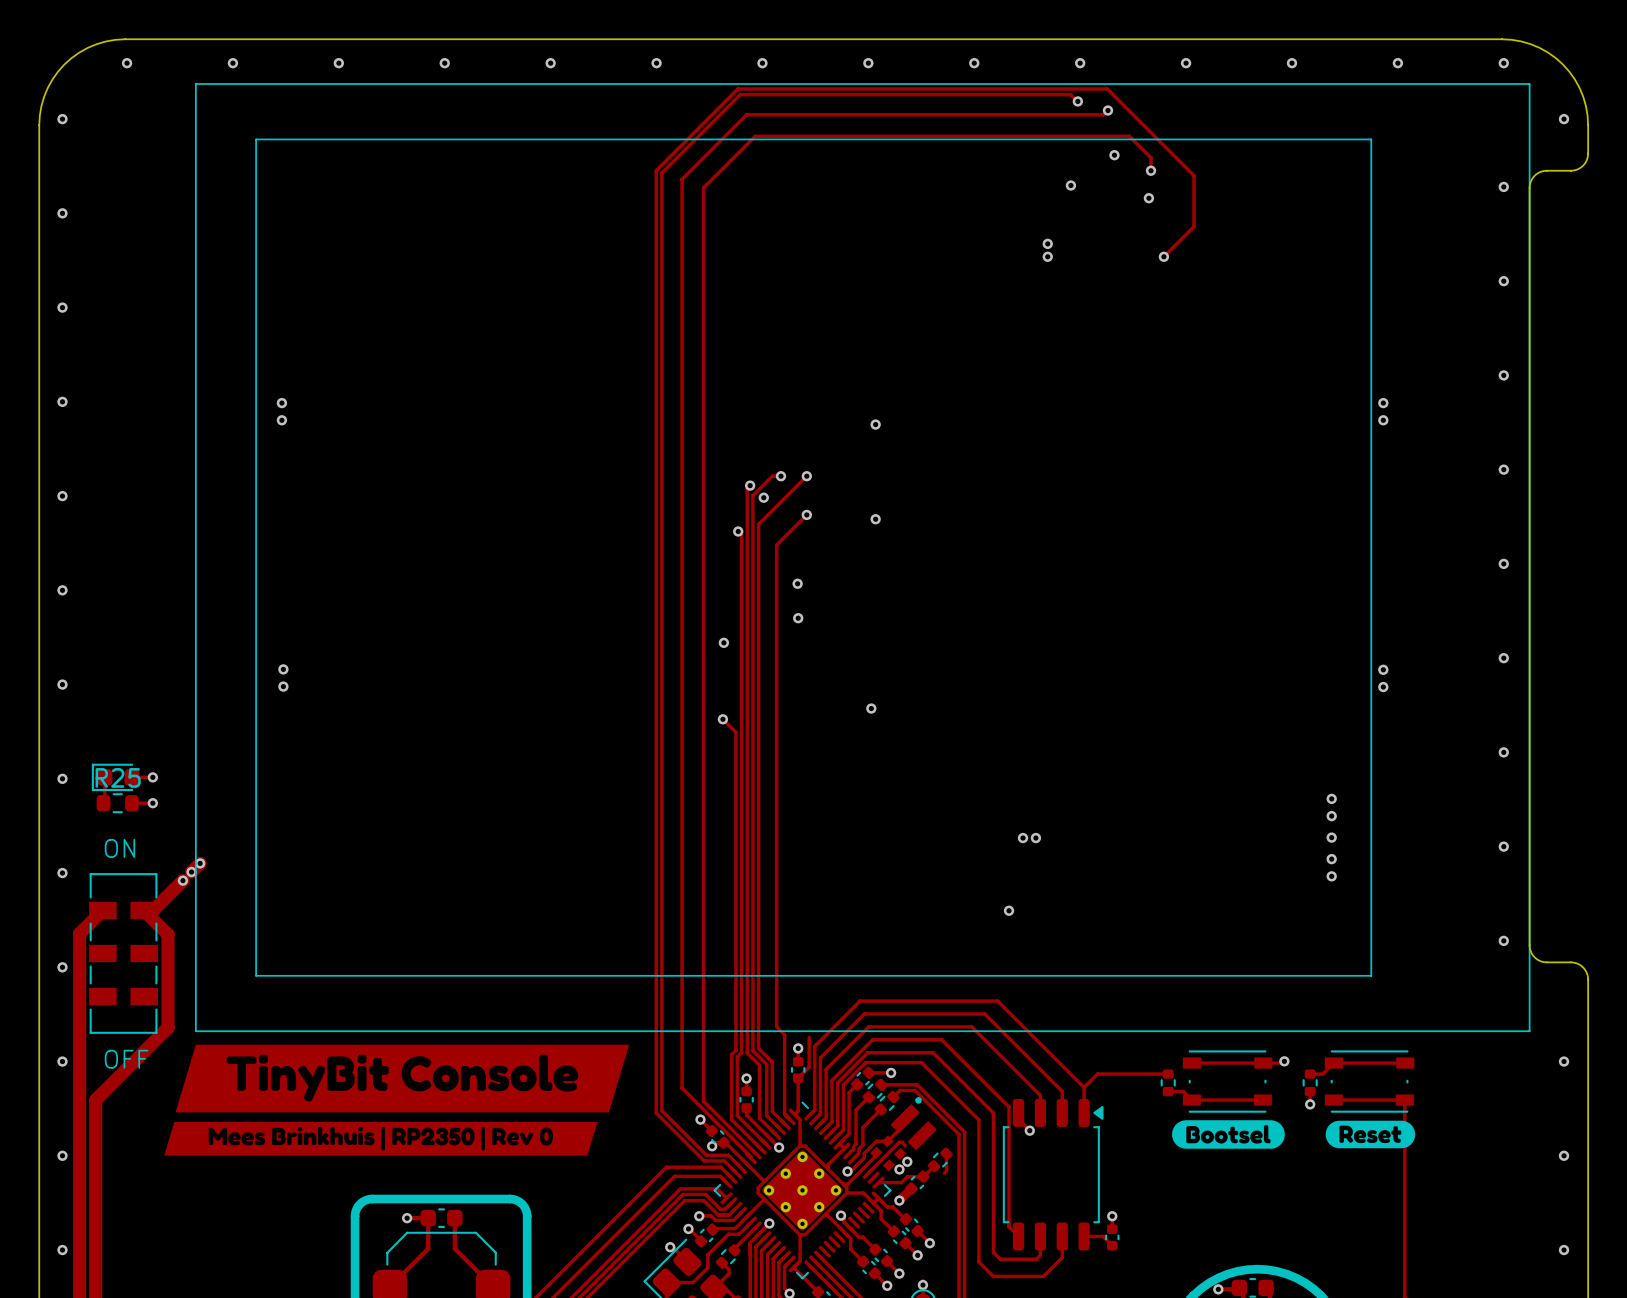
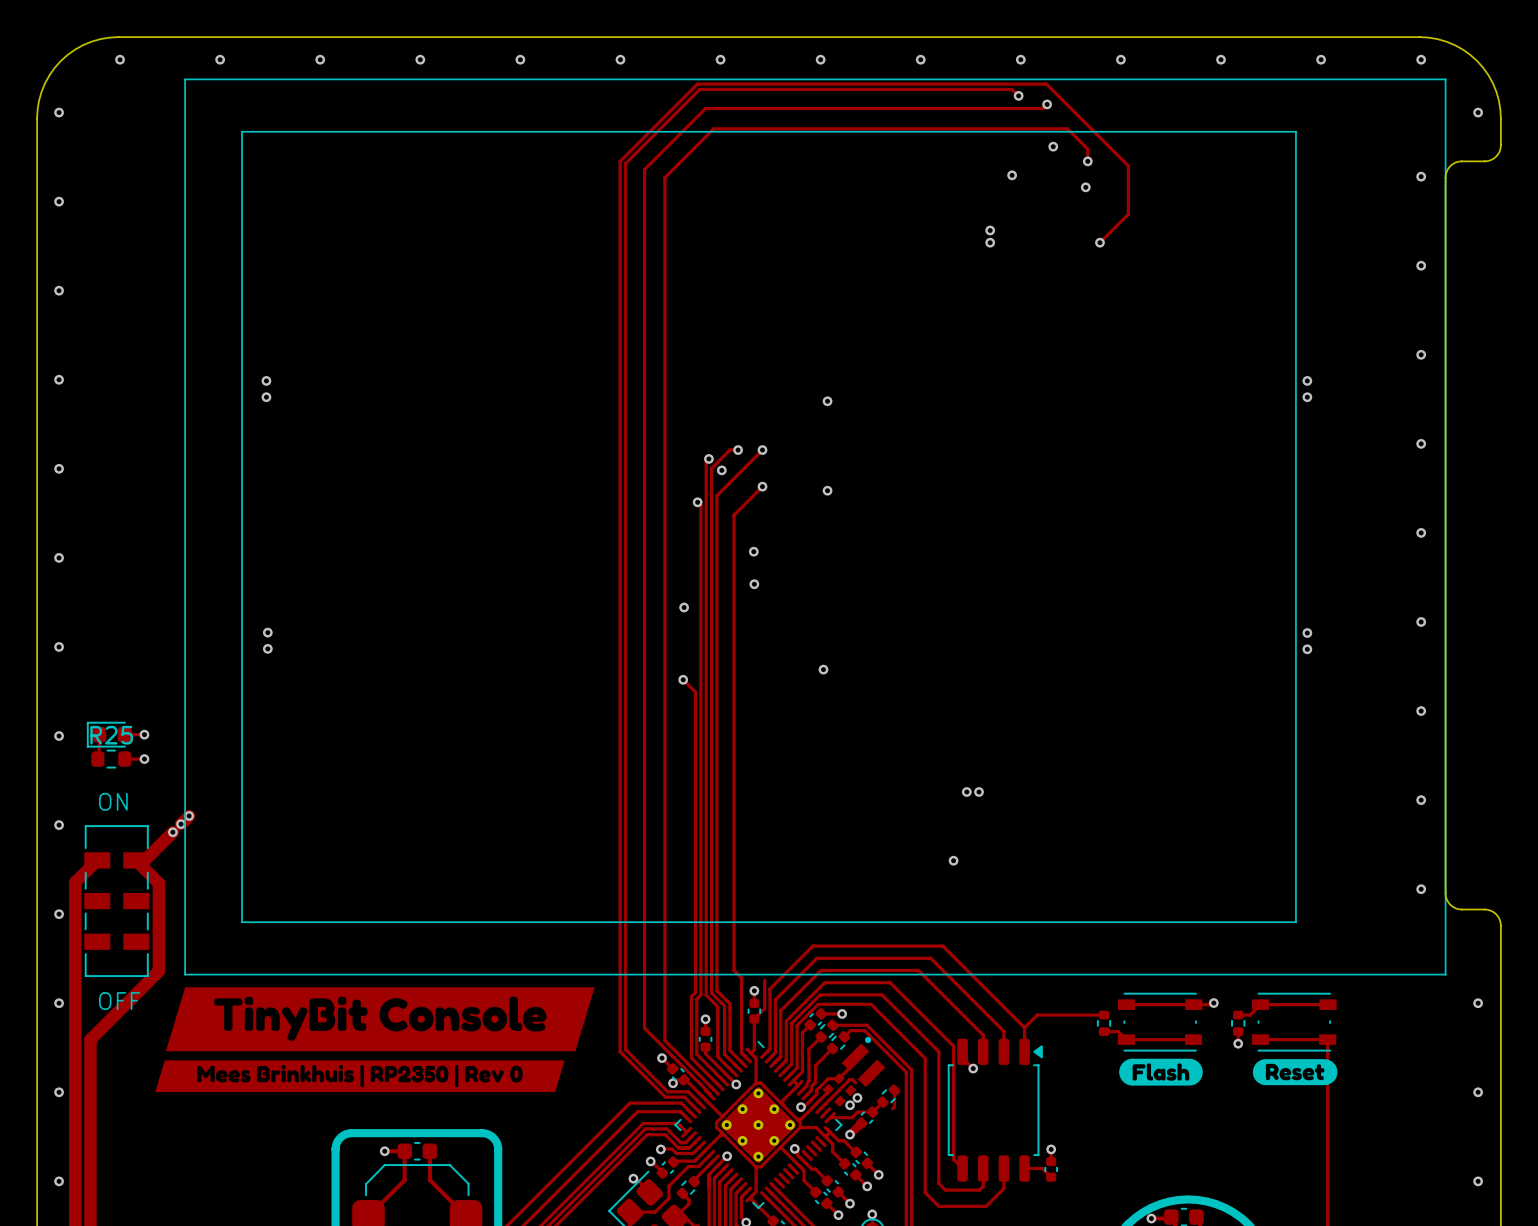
via: (1331, 798) -> none
via: (1331, 816) -> none
via: (1331, 837) -> none
via: (1331, 859) -> none
via: (1331, 876) -> none
drawing shape: [1172, 1120, 1285, 1149] -> [1119, 1058, 1203, 1086]

